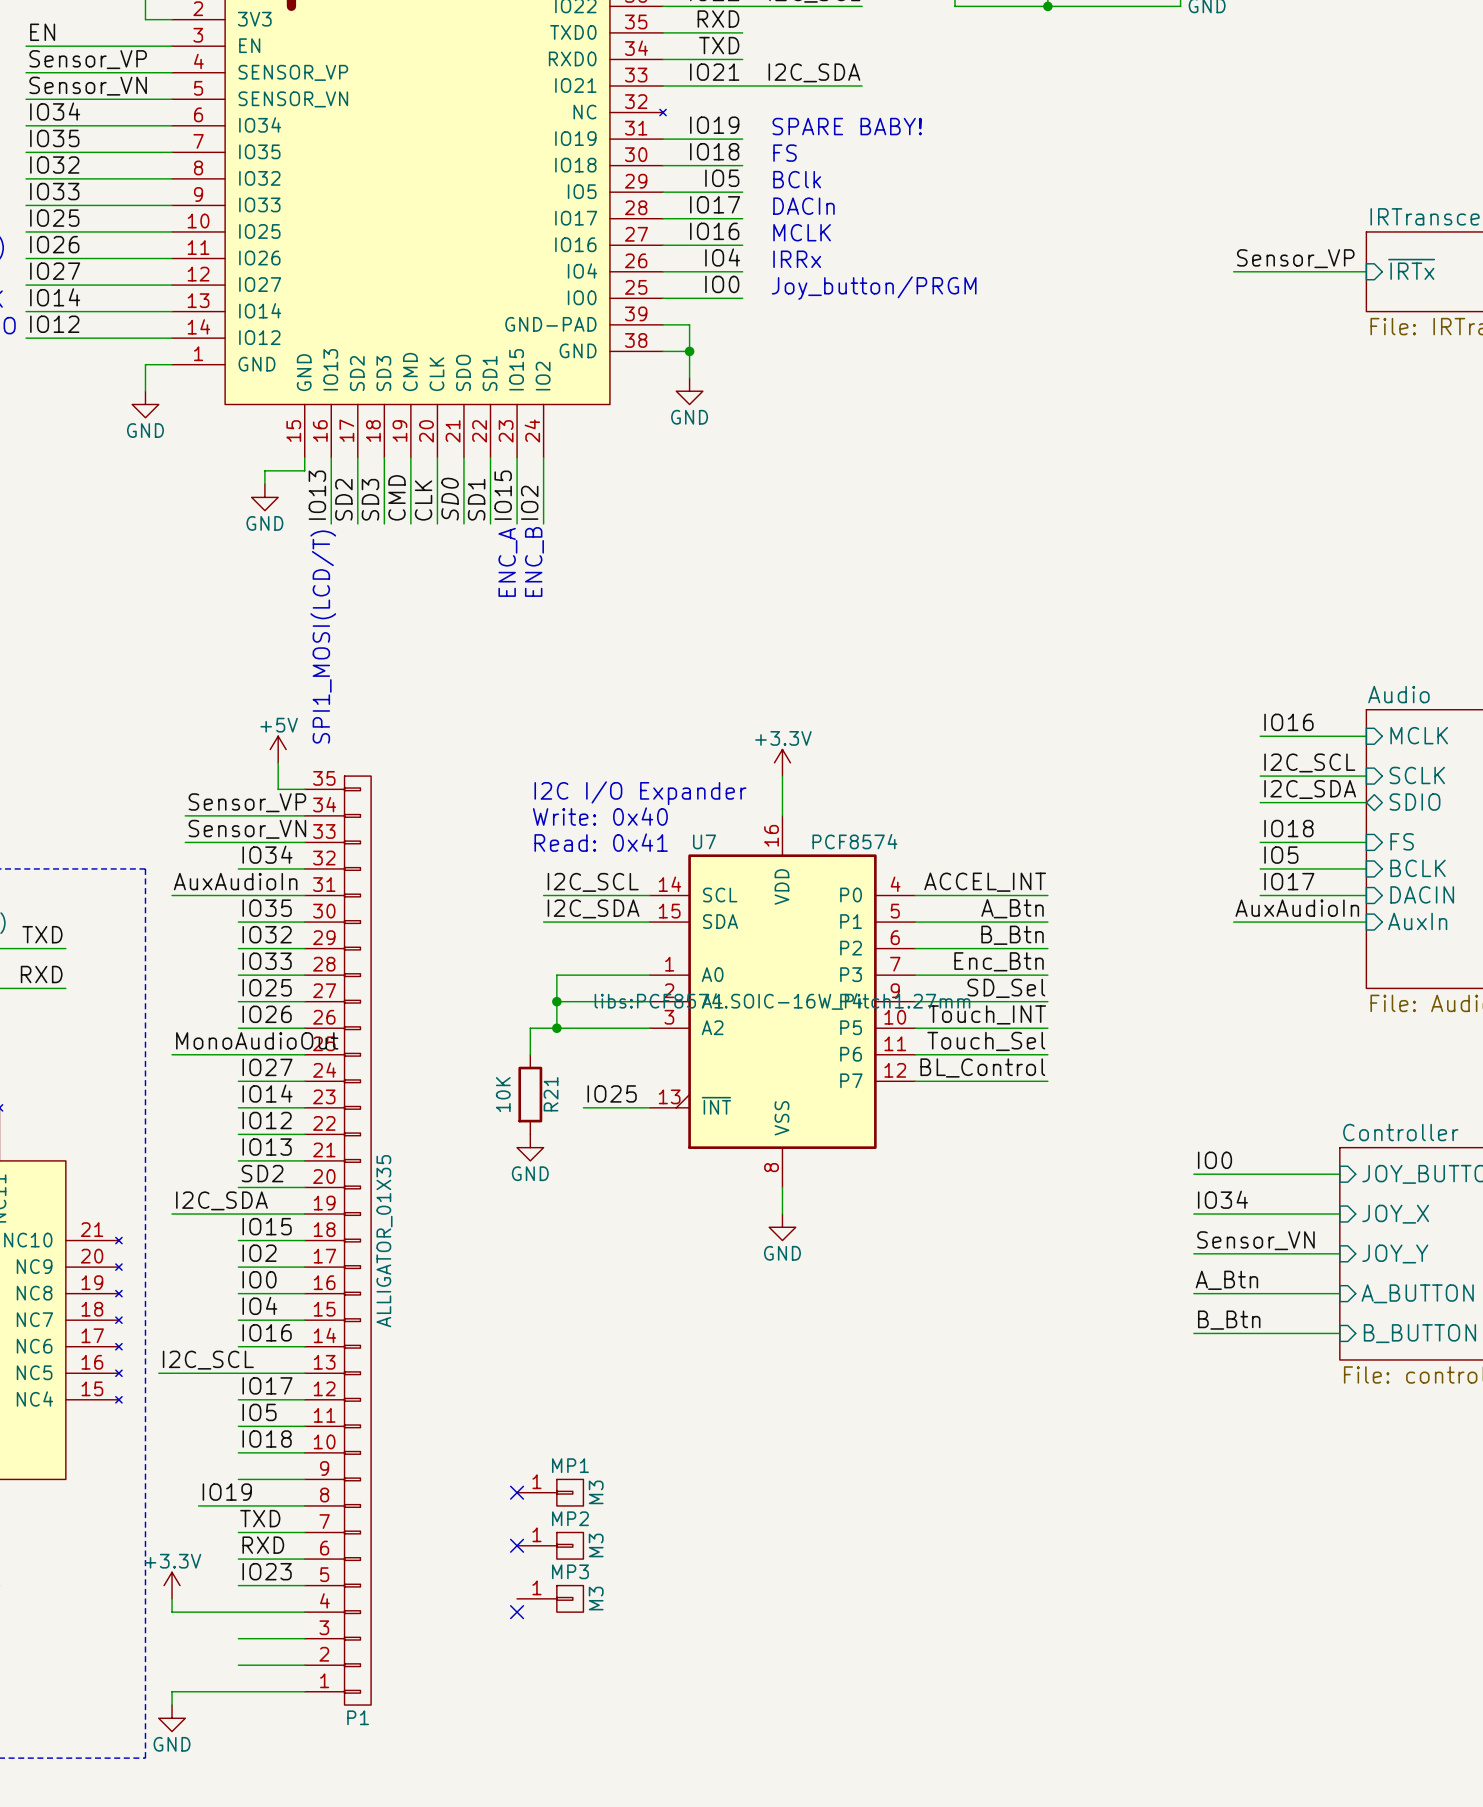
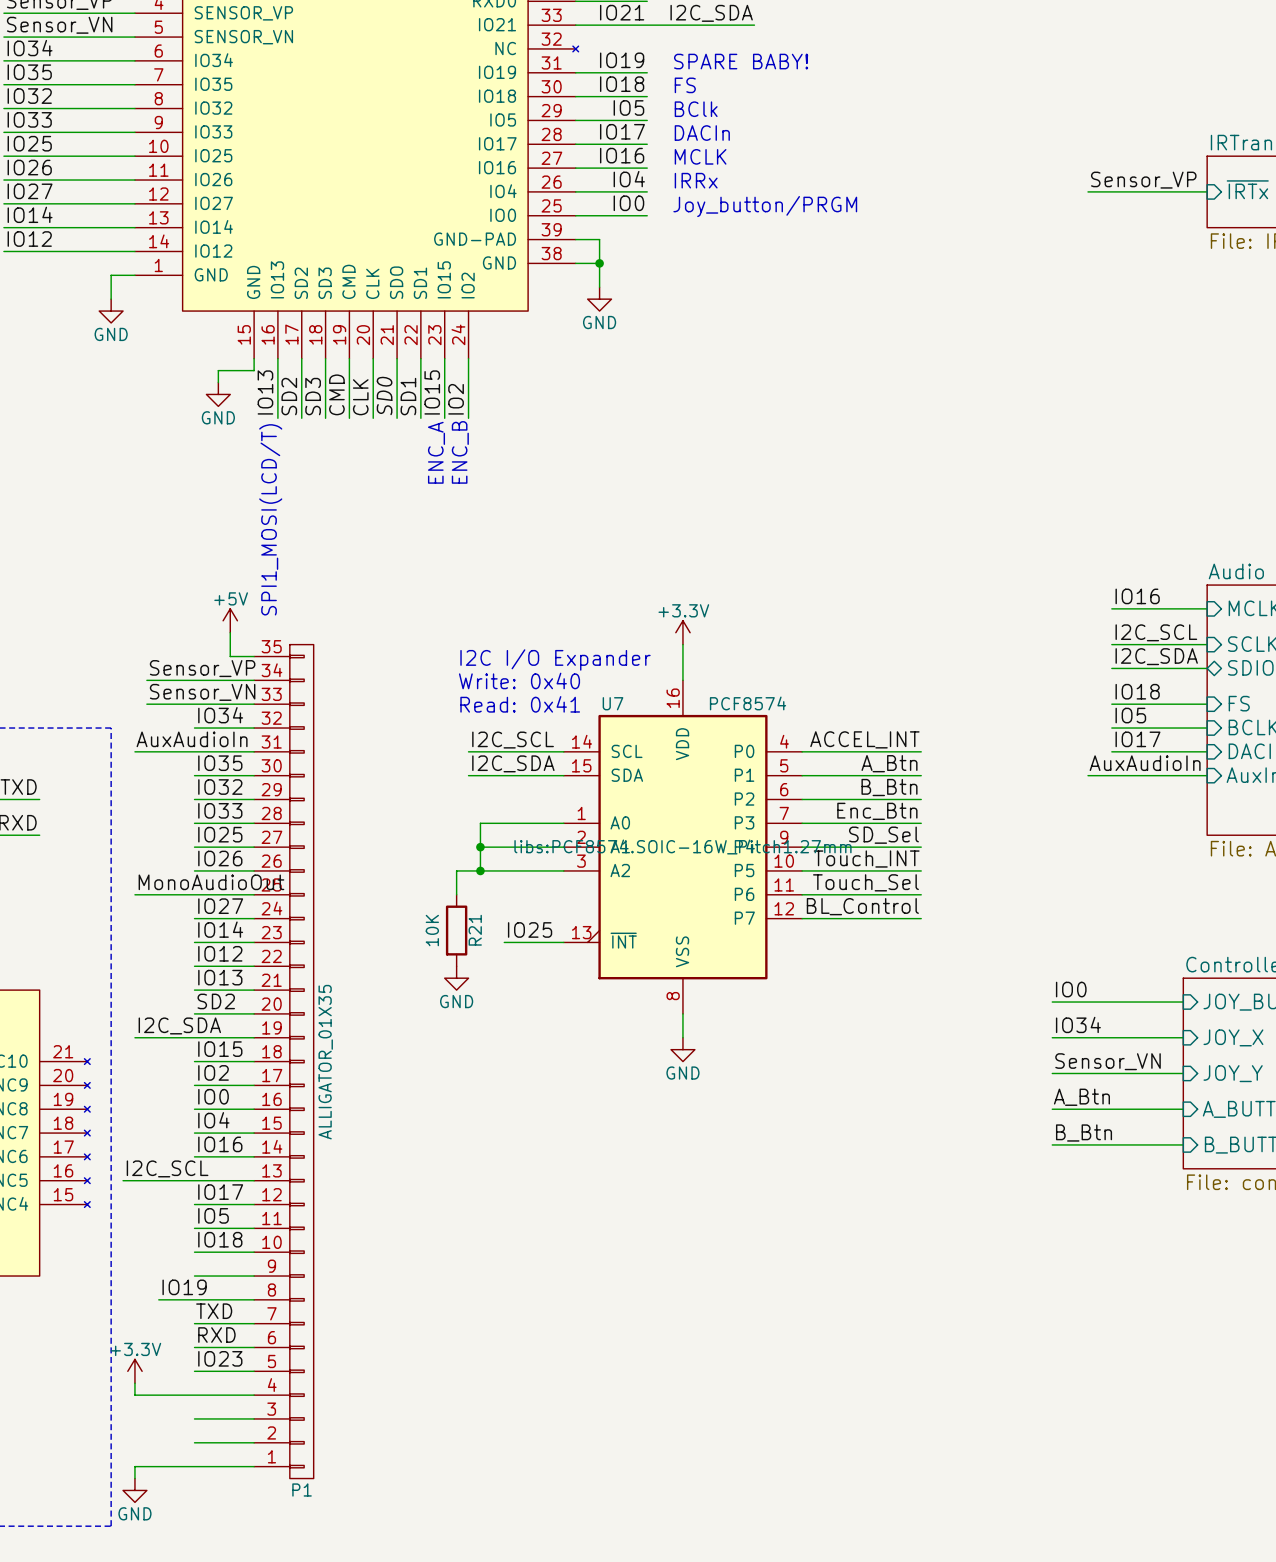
no-connect mark: (517, 1492) -> none
MP1: M3 (550, 1492) -> none
no-connect mark: (517, 1545) -> none
MP2: M3 (550, 1545) -> none
MP3: M3 (550, 1598) -> none
no-connect mark: (517, 1612) -> none

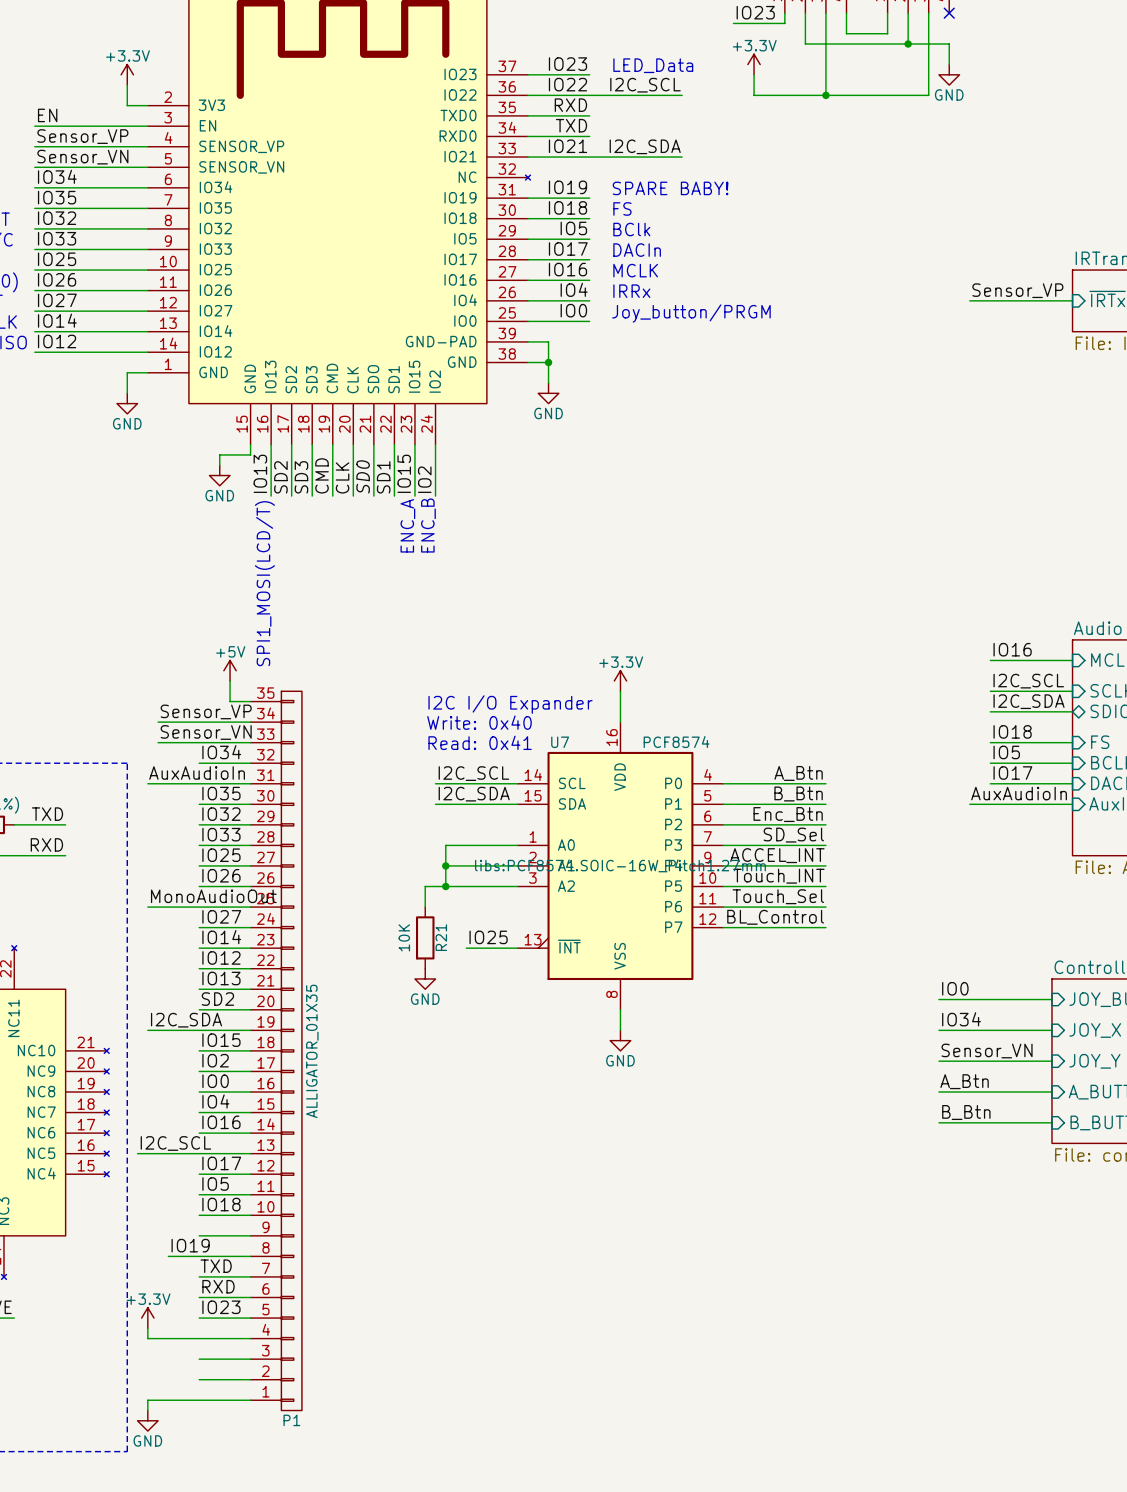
label: ACCEL_INT (864, 739) -> A_Btn (798, 773)
label: A_Btn (889, 763) -> B_Btn (798, 794)
label: B_Btn (889, 787) -> Enc_Btn (788, 814)
label: Enc_Btn (877, 811) -> SD_Sel (793, 835)
label: SD_Sel (883, 835) -> ACCEL_INT (777, 855)

